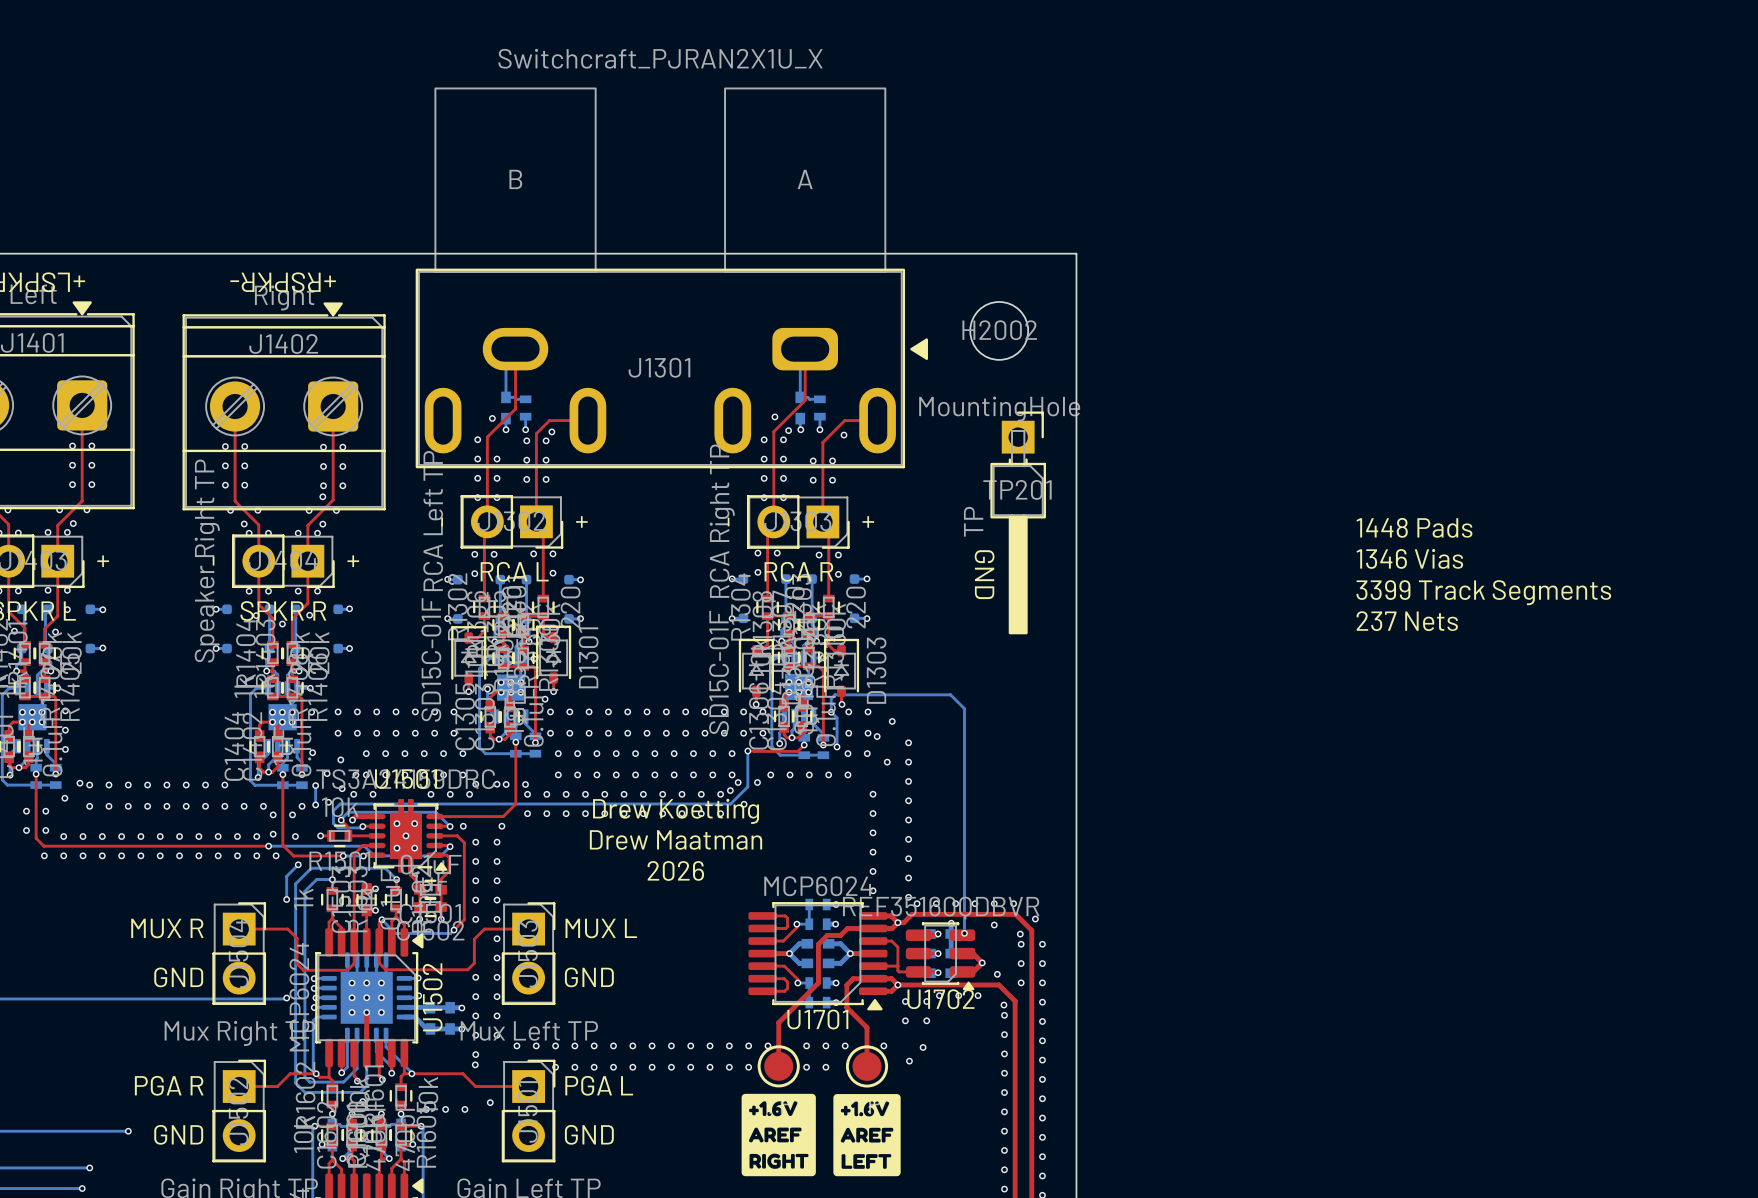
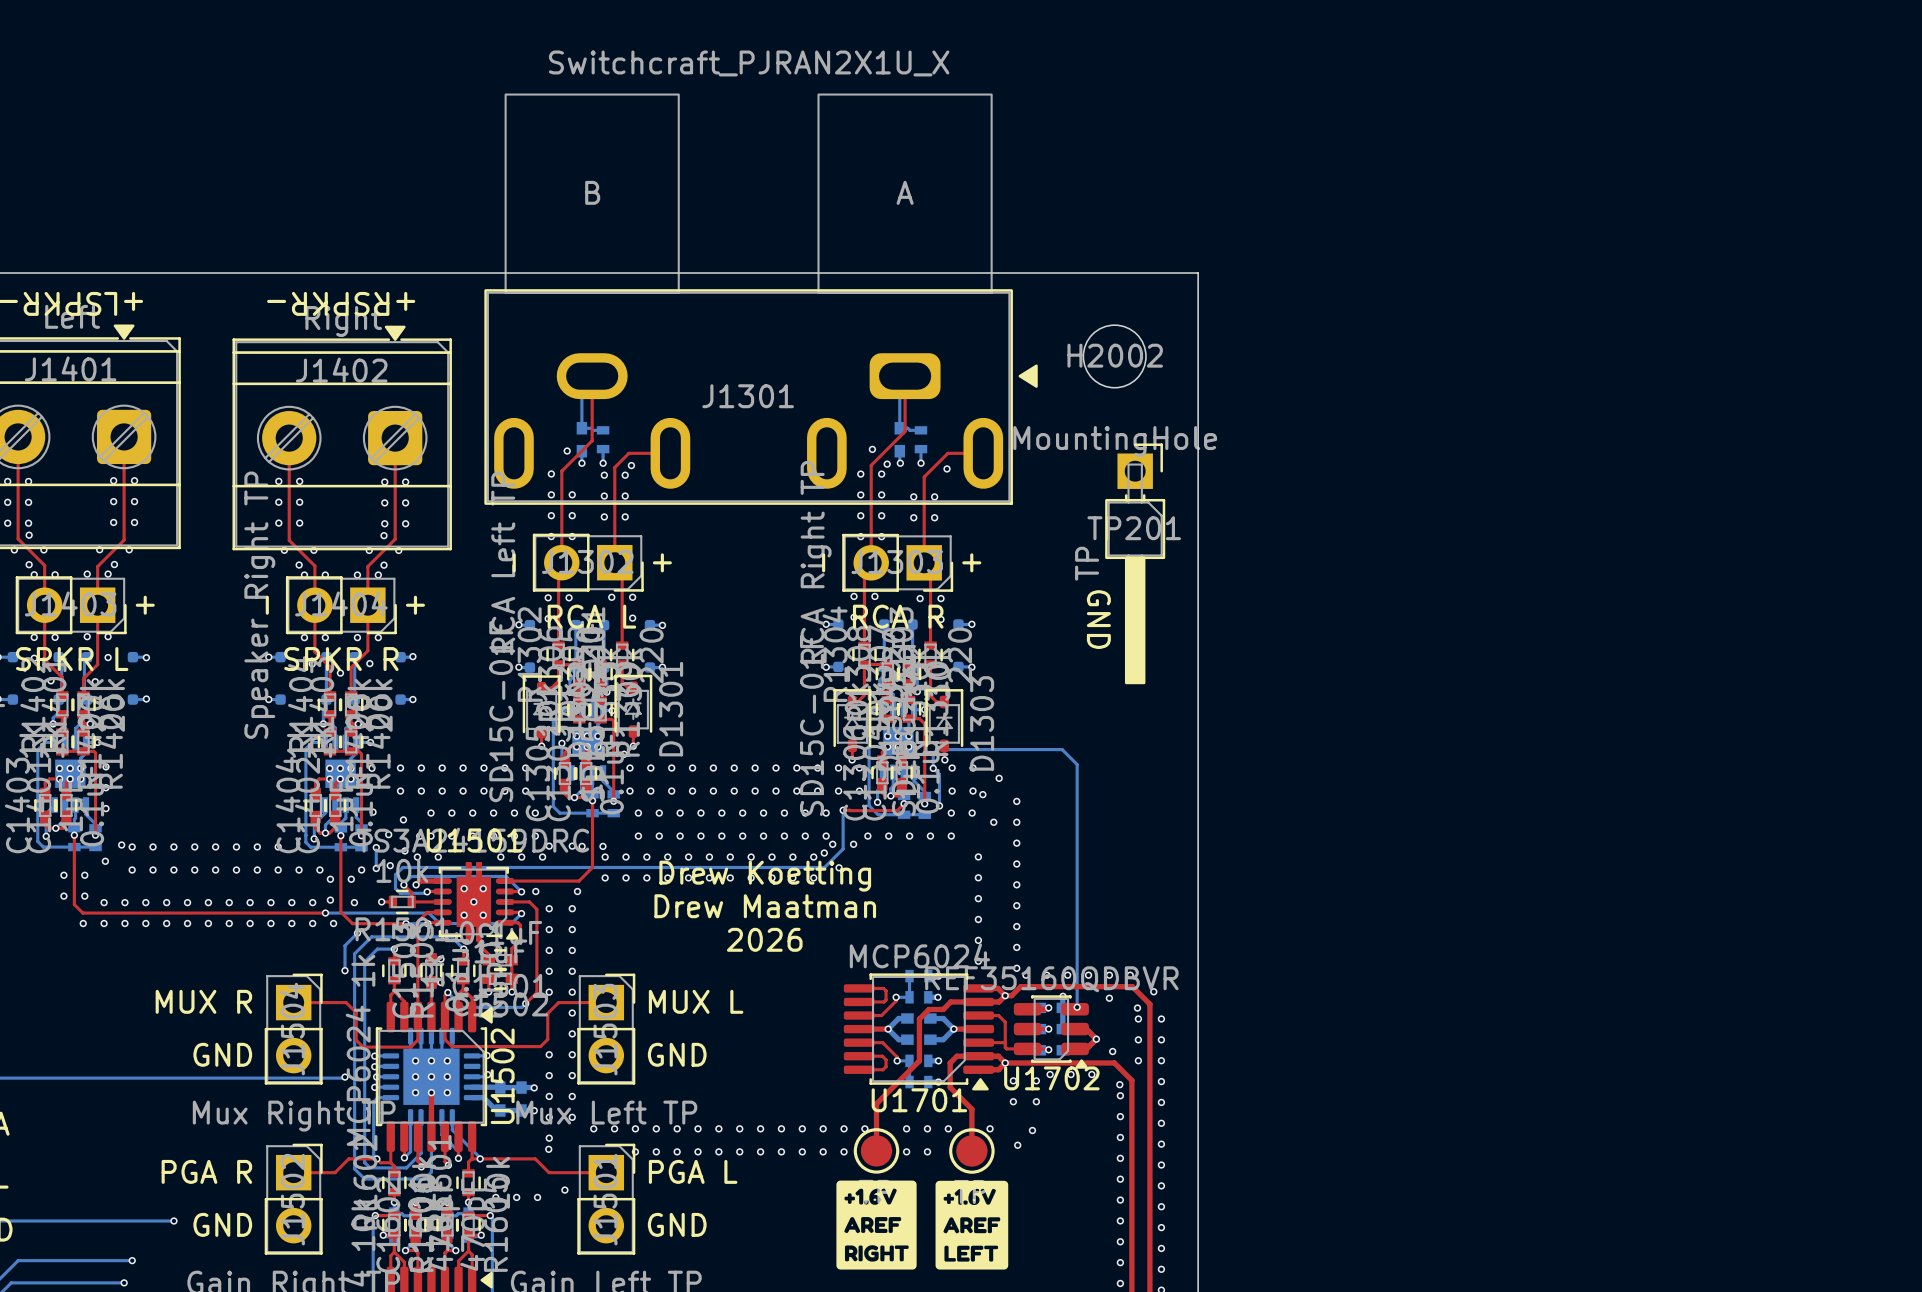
text: 1448 Pads (1414, 527) -> none
text: 1346 Vias (1409, 558) -> none
text: 3399 Track Segments (1483, 592) -> none
text: 237 Nets (1407, 621) -> none

